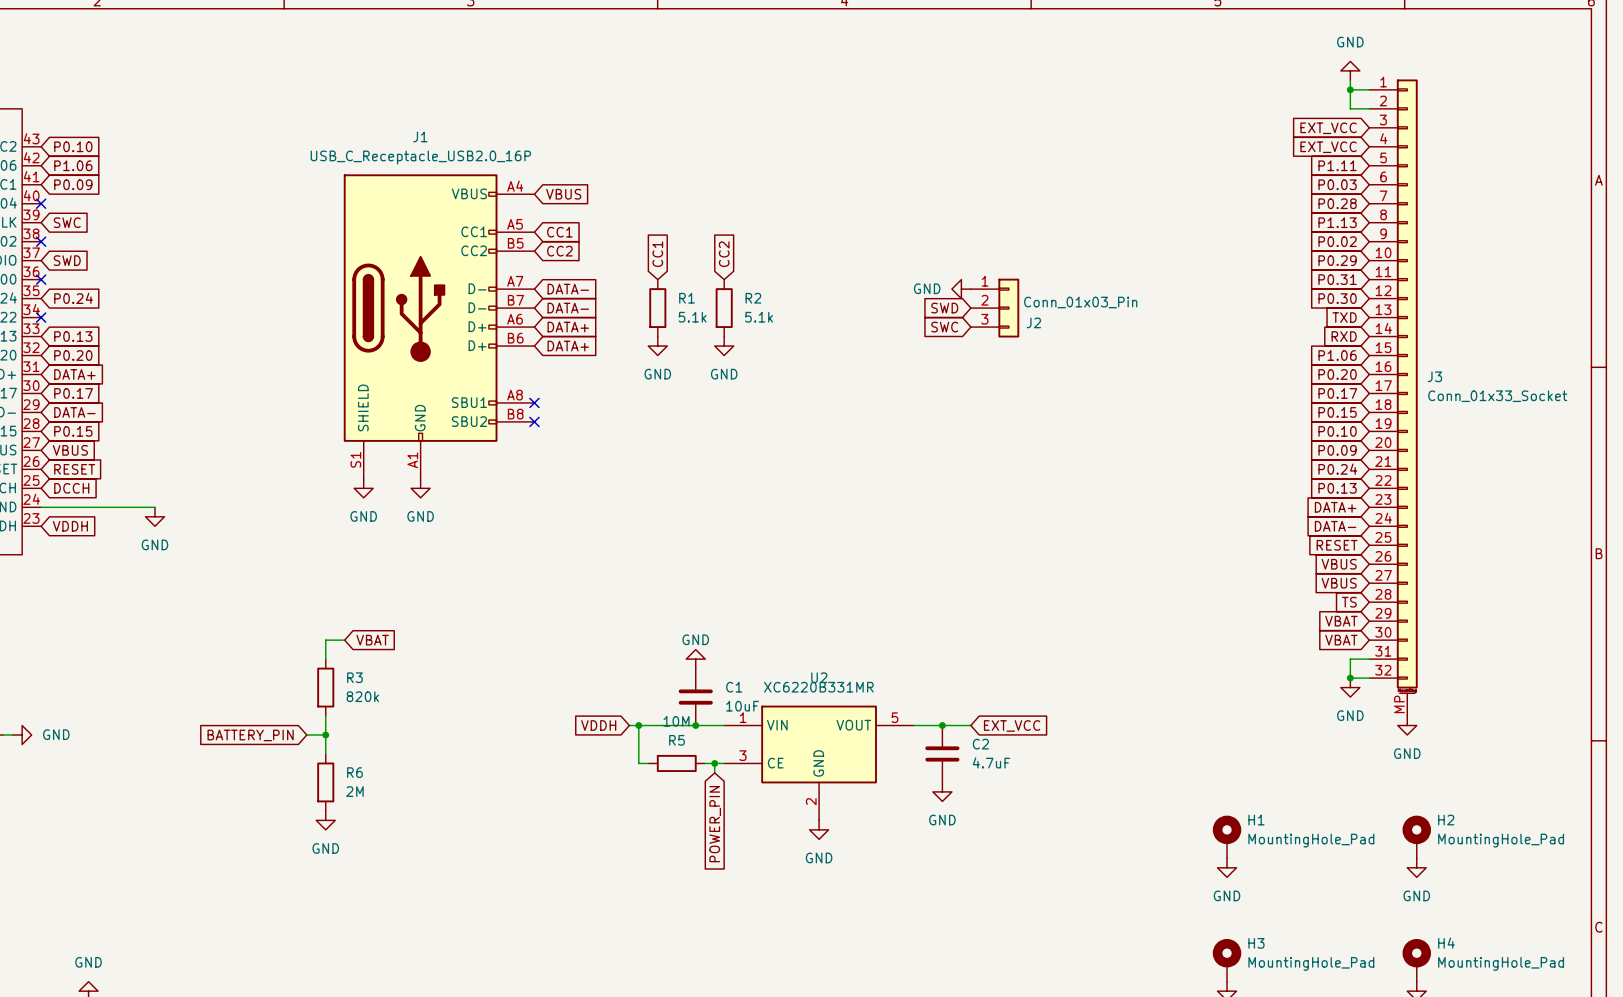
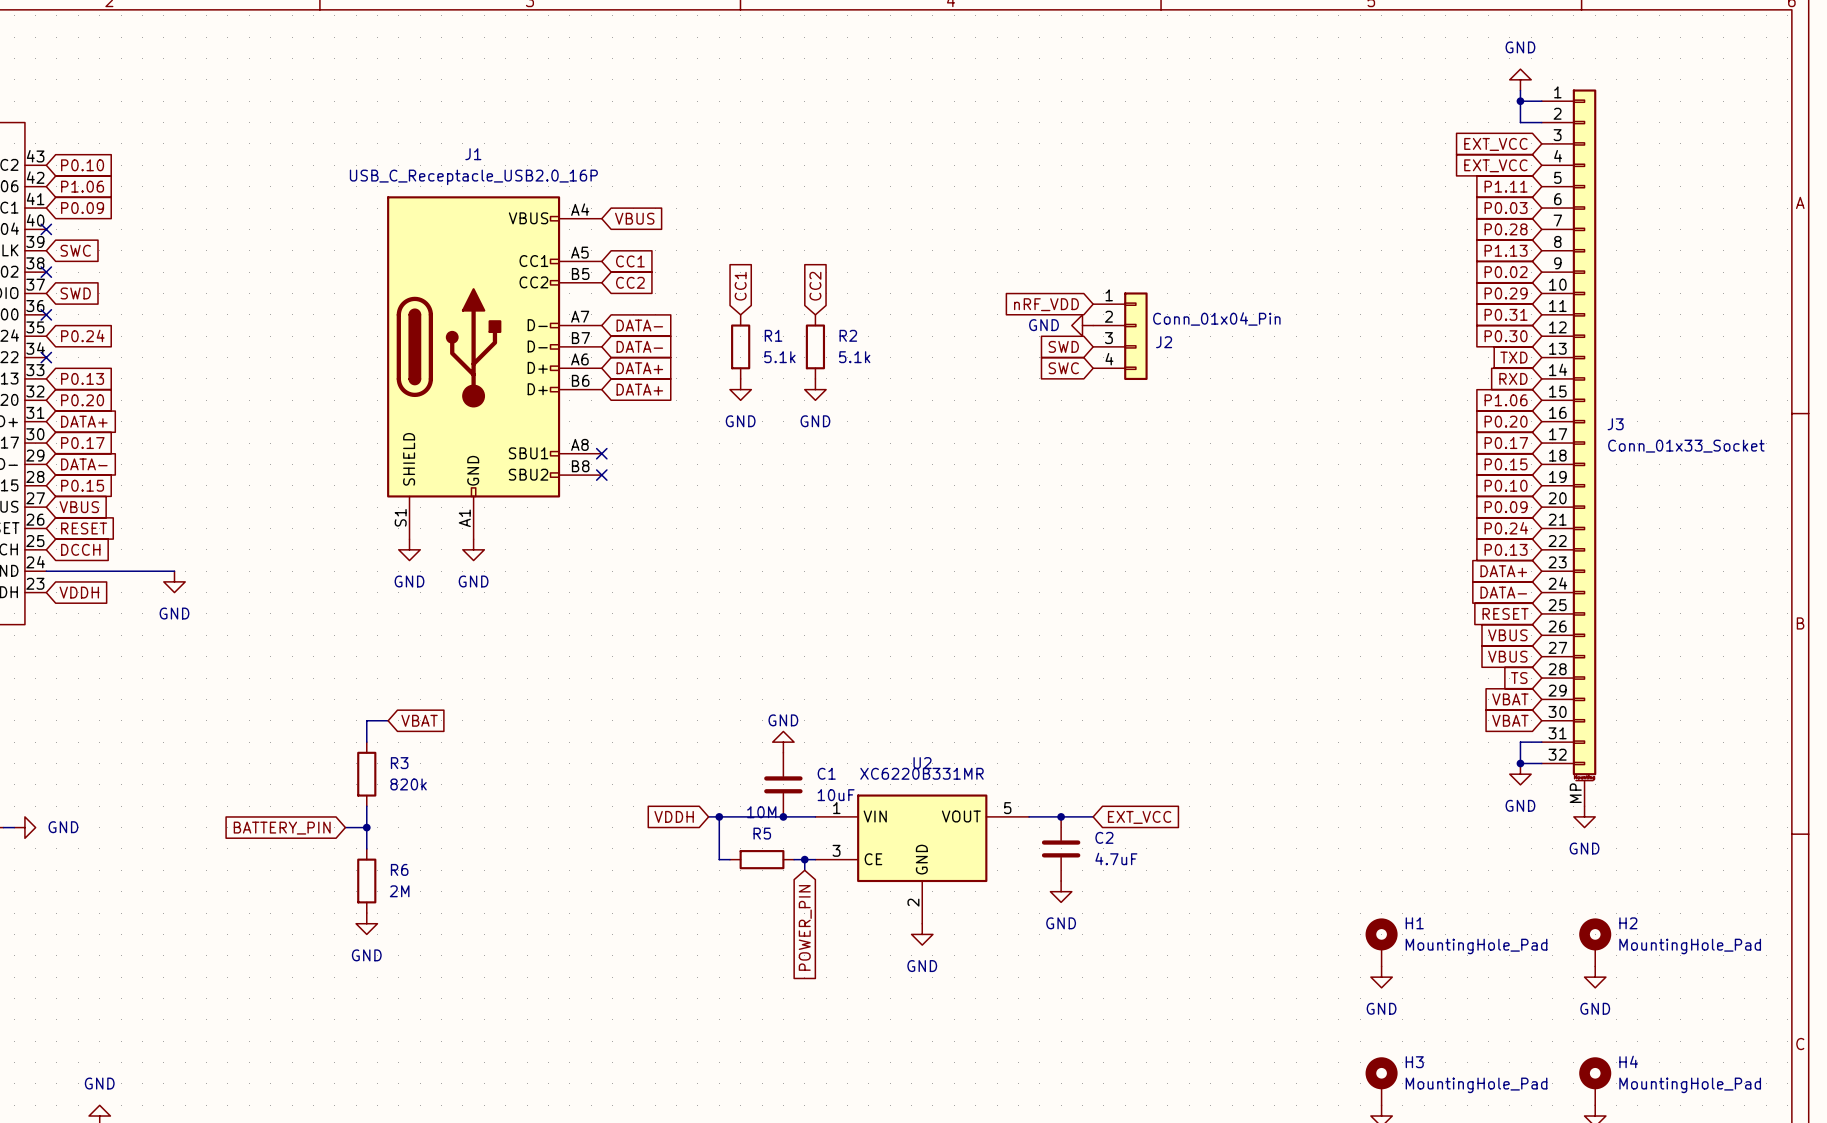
global label: none -> nRF_VDD (1046, 304)
J2 symbol: [970, 278, 1020, 338] -> [1093, 292, 1148, 381]
J2 value: Conn_01x03_Pin (1080, 302) -> Conn_01x04_Pin (1216, 318)

